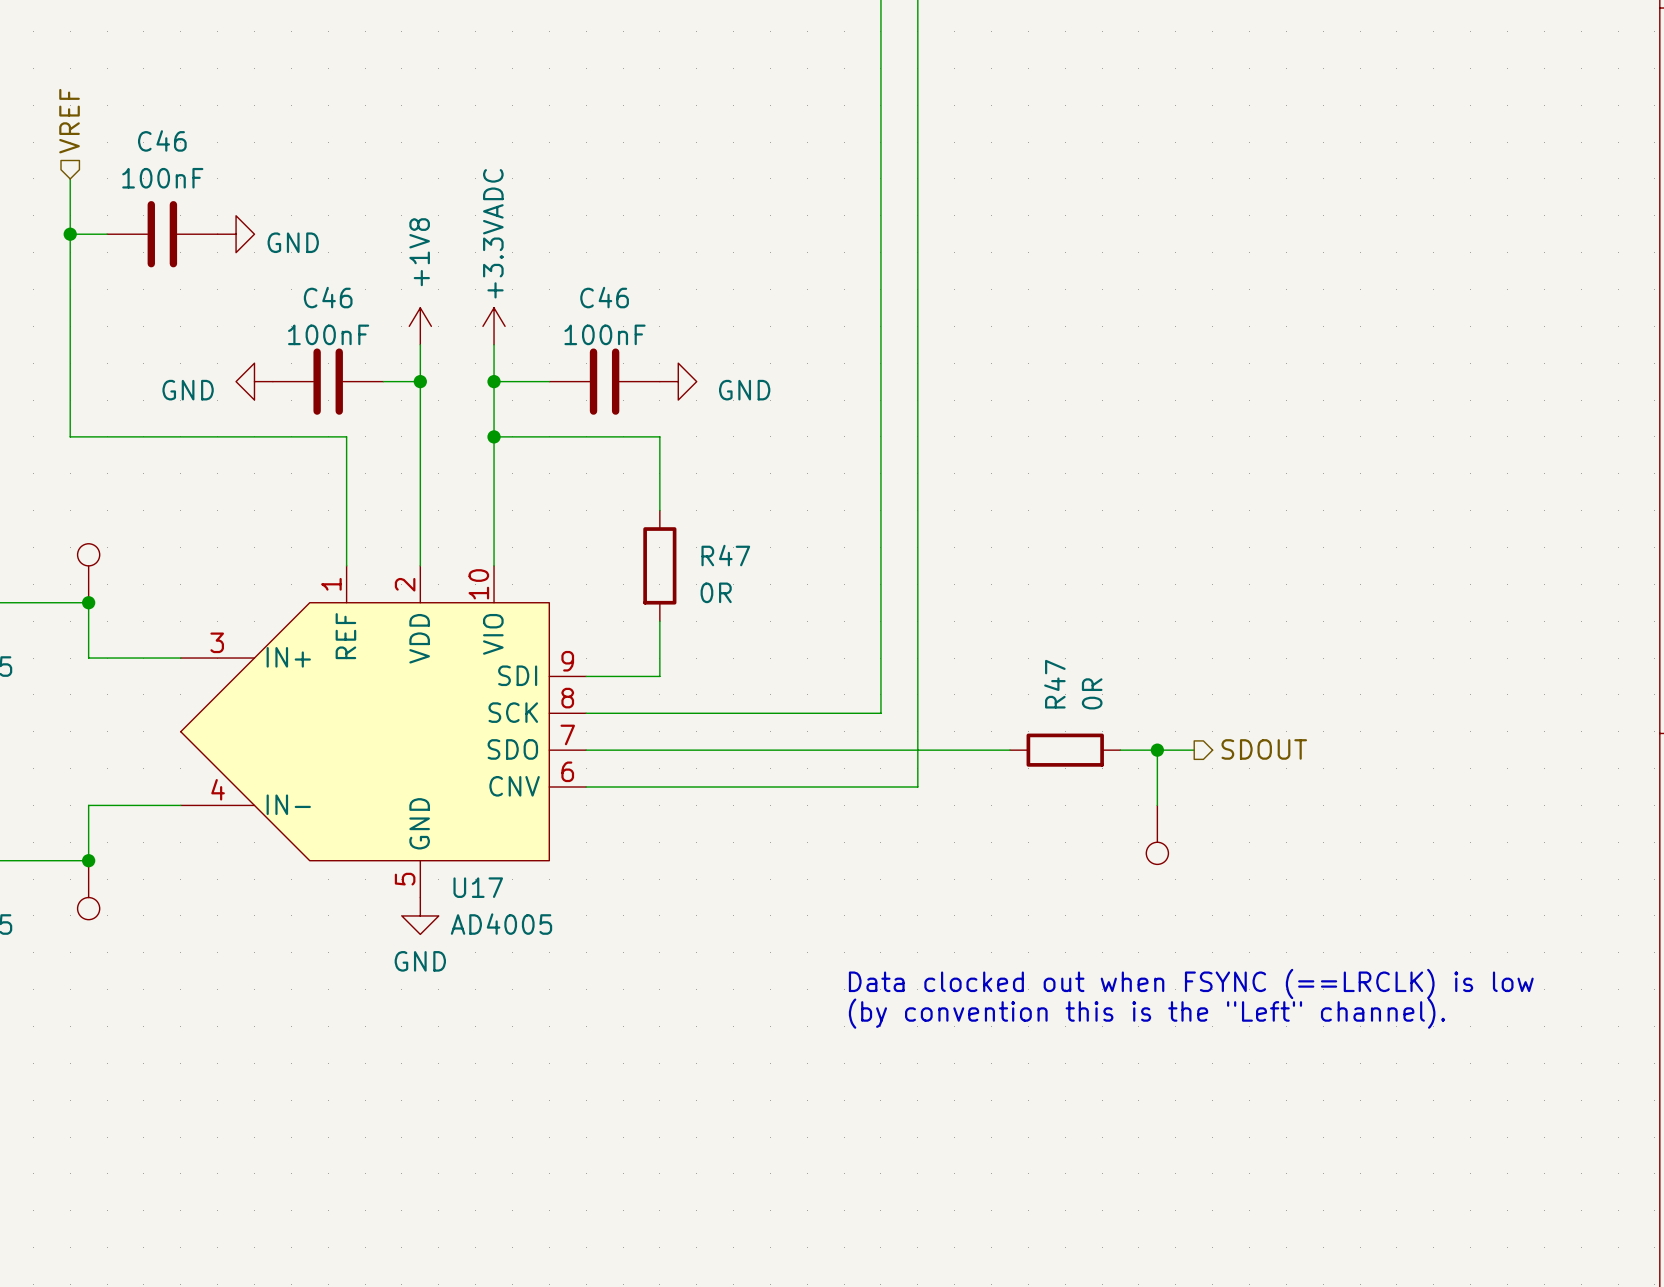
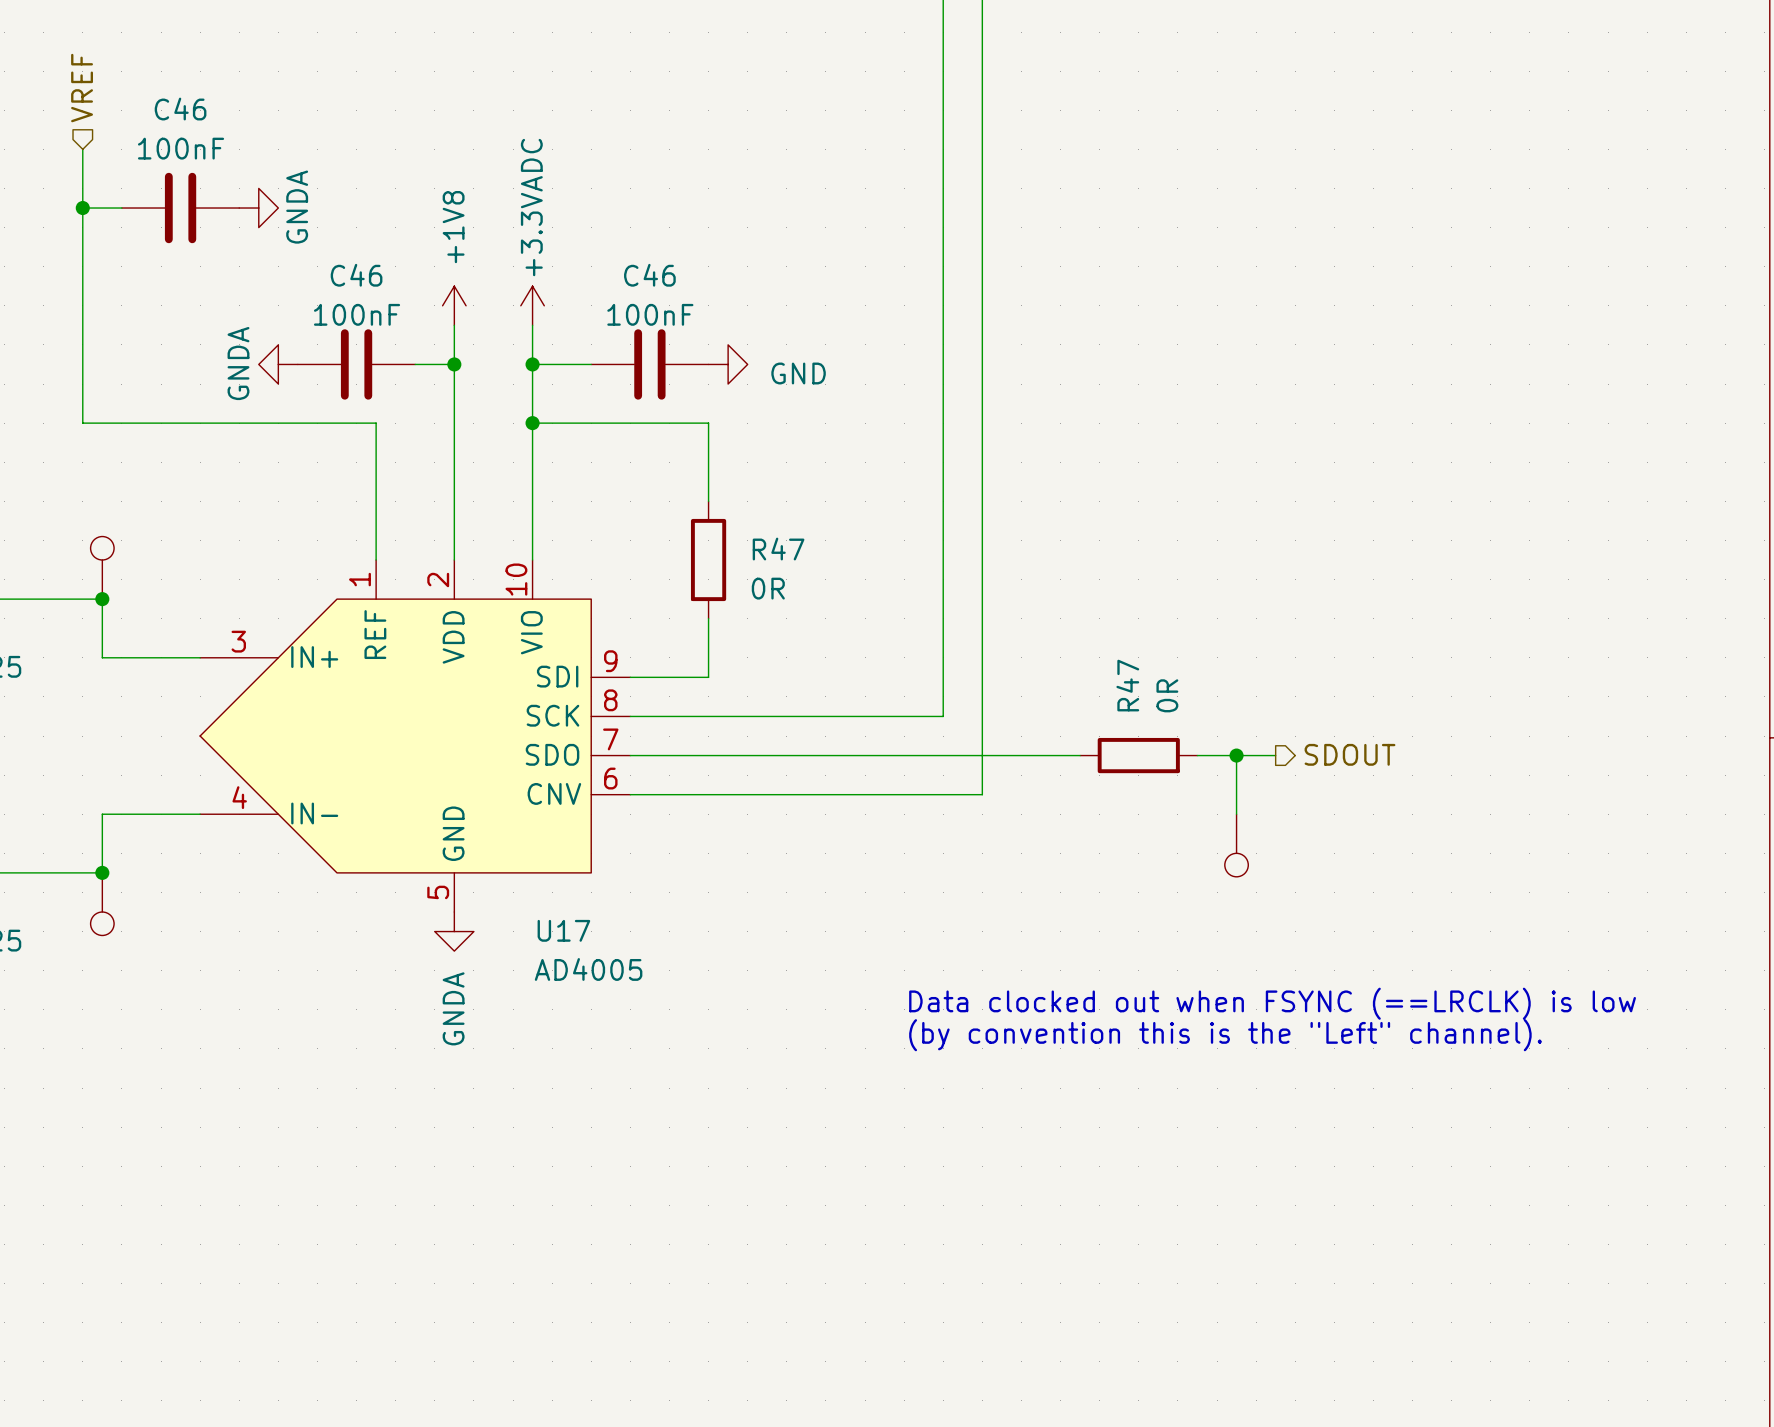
power symbol: GND (236, 234) -> GNDA (258, 208)
power symbol: GND (254, 381) -> GNDA (278, 364)
U17 name position: U17 (478, 887) -> U17 (563, 930)
power symbol: GND (420, 915) -> GNDA (454, 931)
U17 value position: AD4005 (501, 924) -> AD4005 (588, 969)

